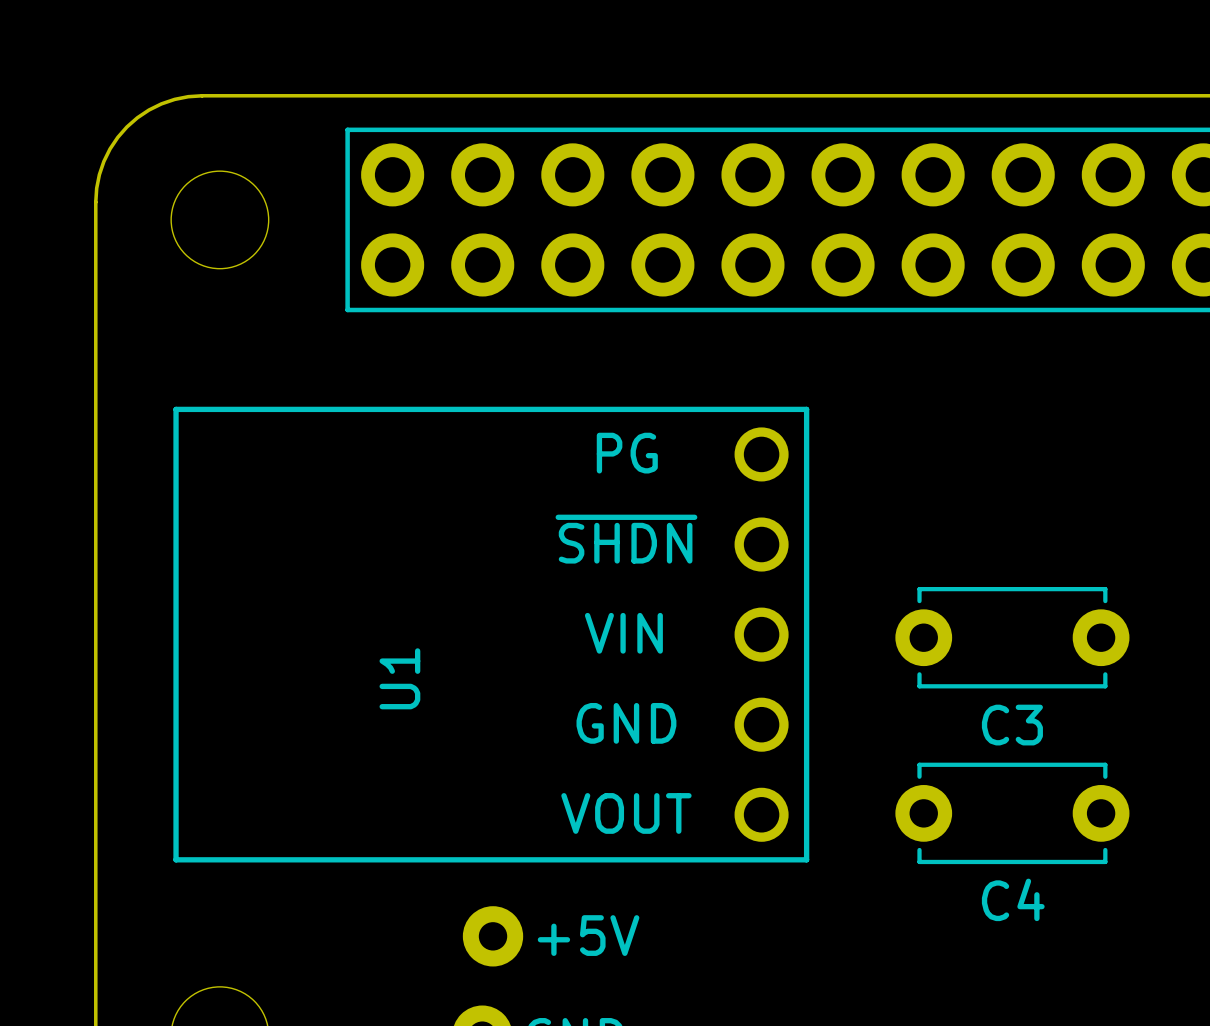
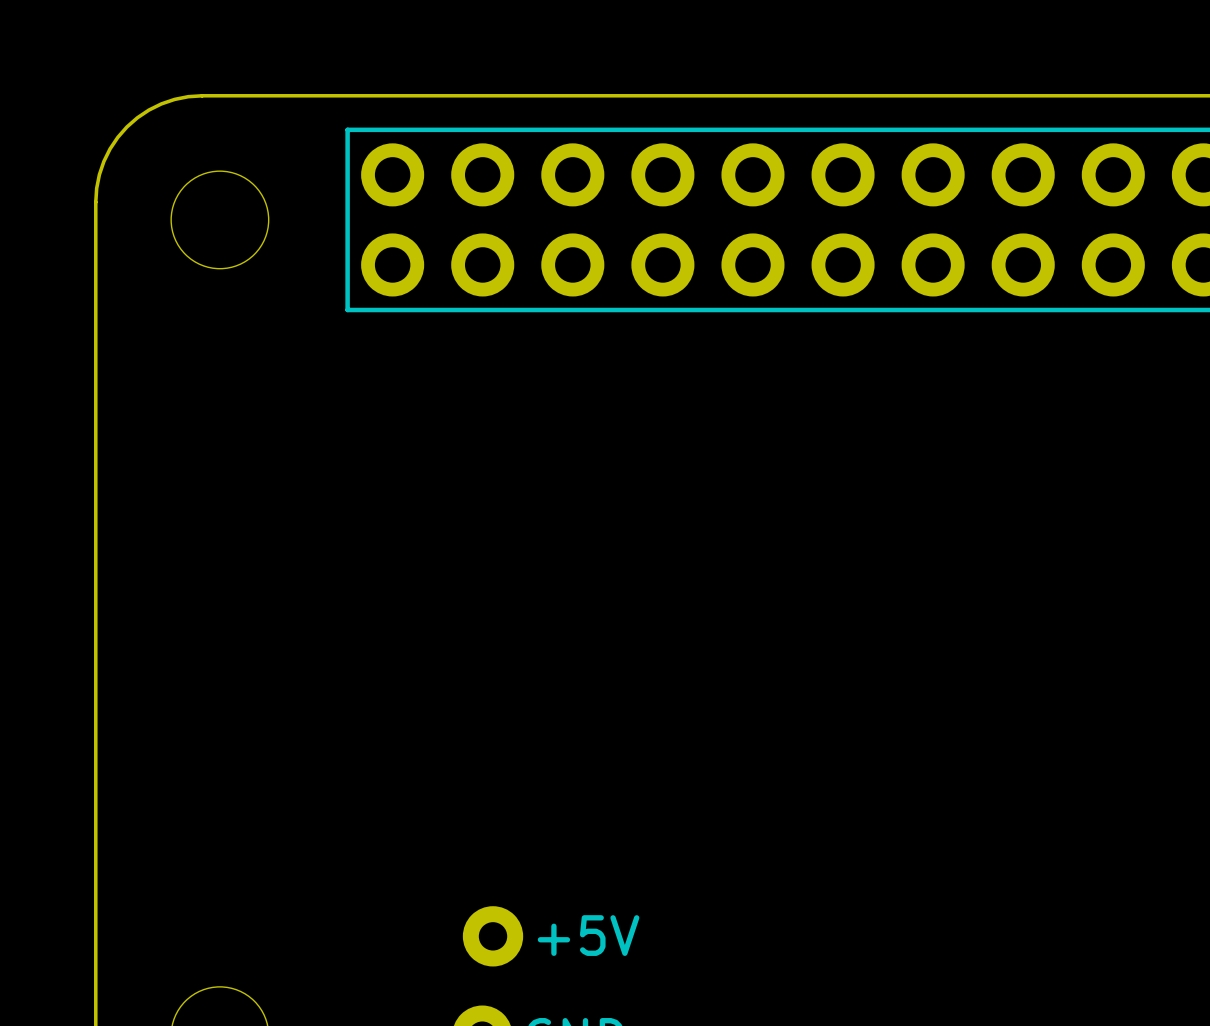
U1: (491, 634) -> none
C3: (1012, 637) -> none
C4: (1012, 813) -> none

